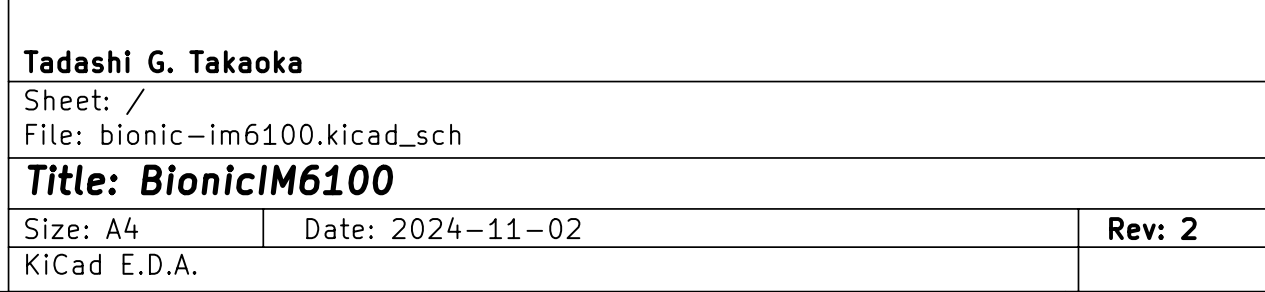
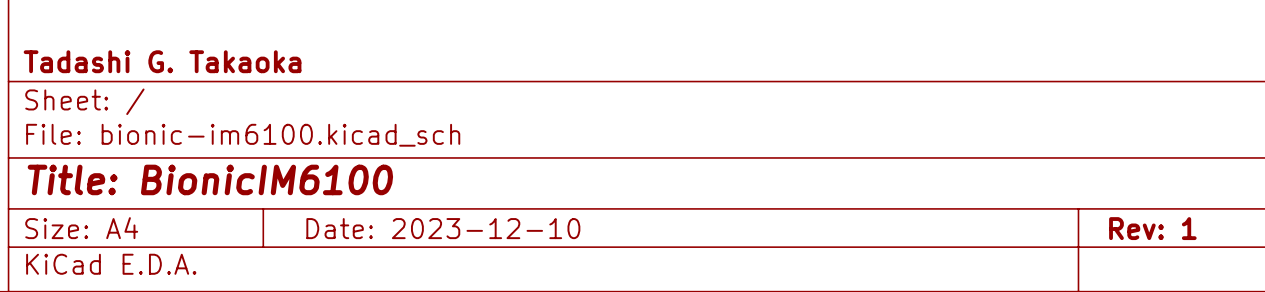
title block: Date: 2024-11-02 (443, 228) -> Date: 2023-12-10 (443, 228)
title block: Rev: 2 (1152, 228) -> Rev: 1 (1152, 228)

